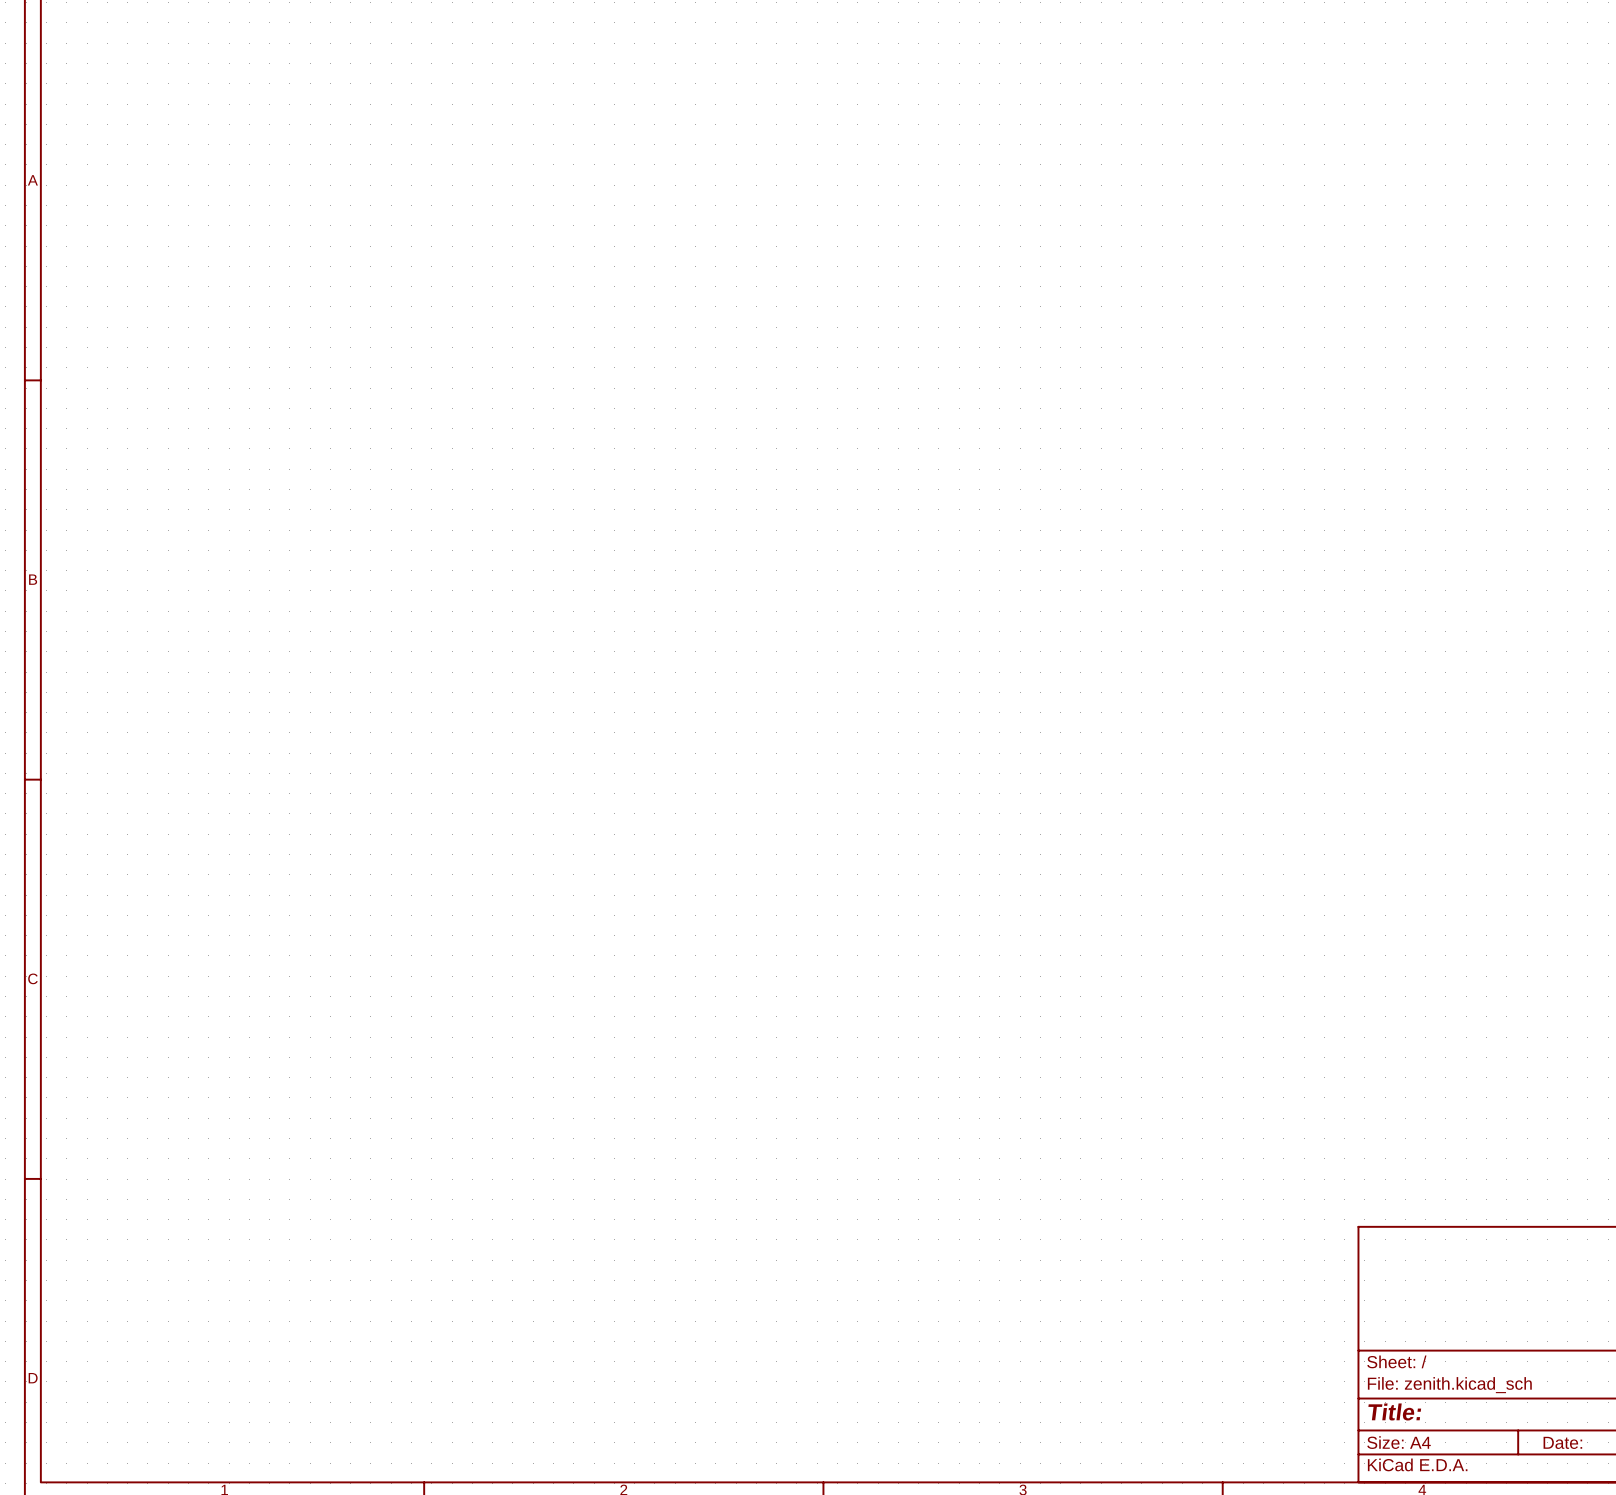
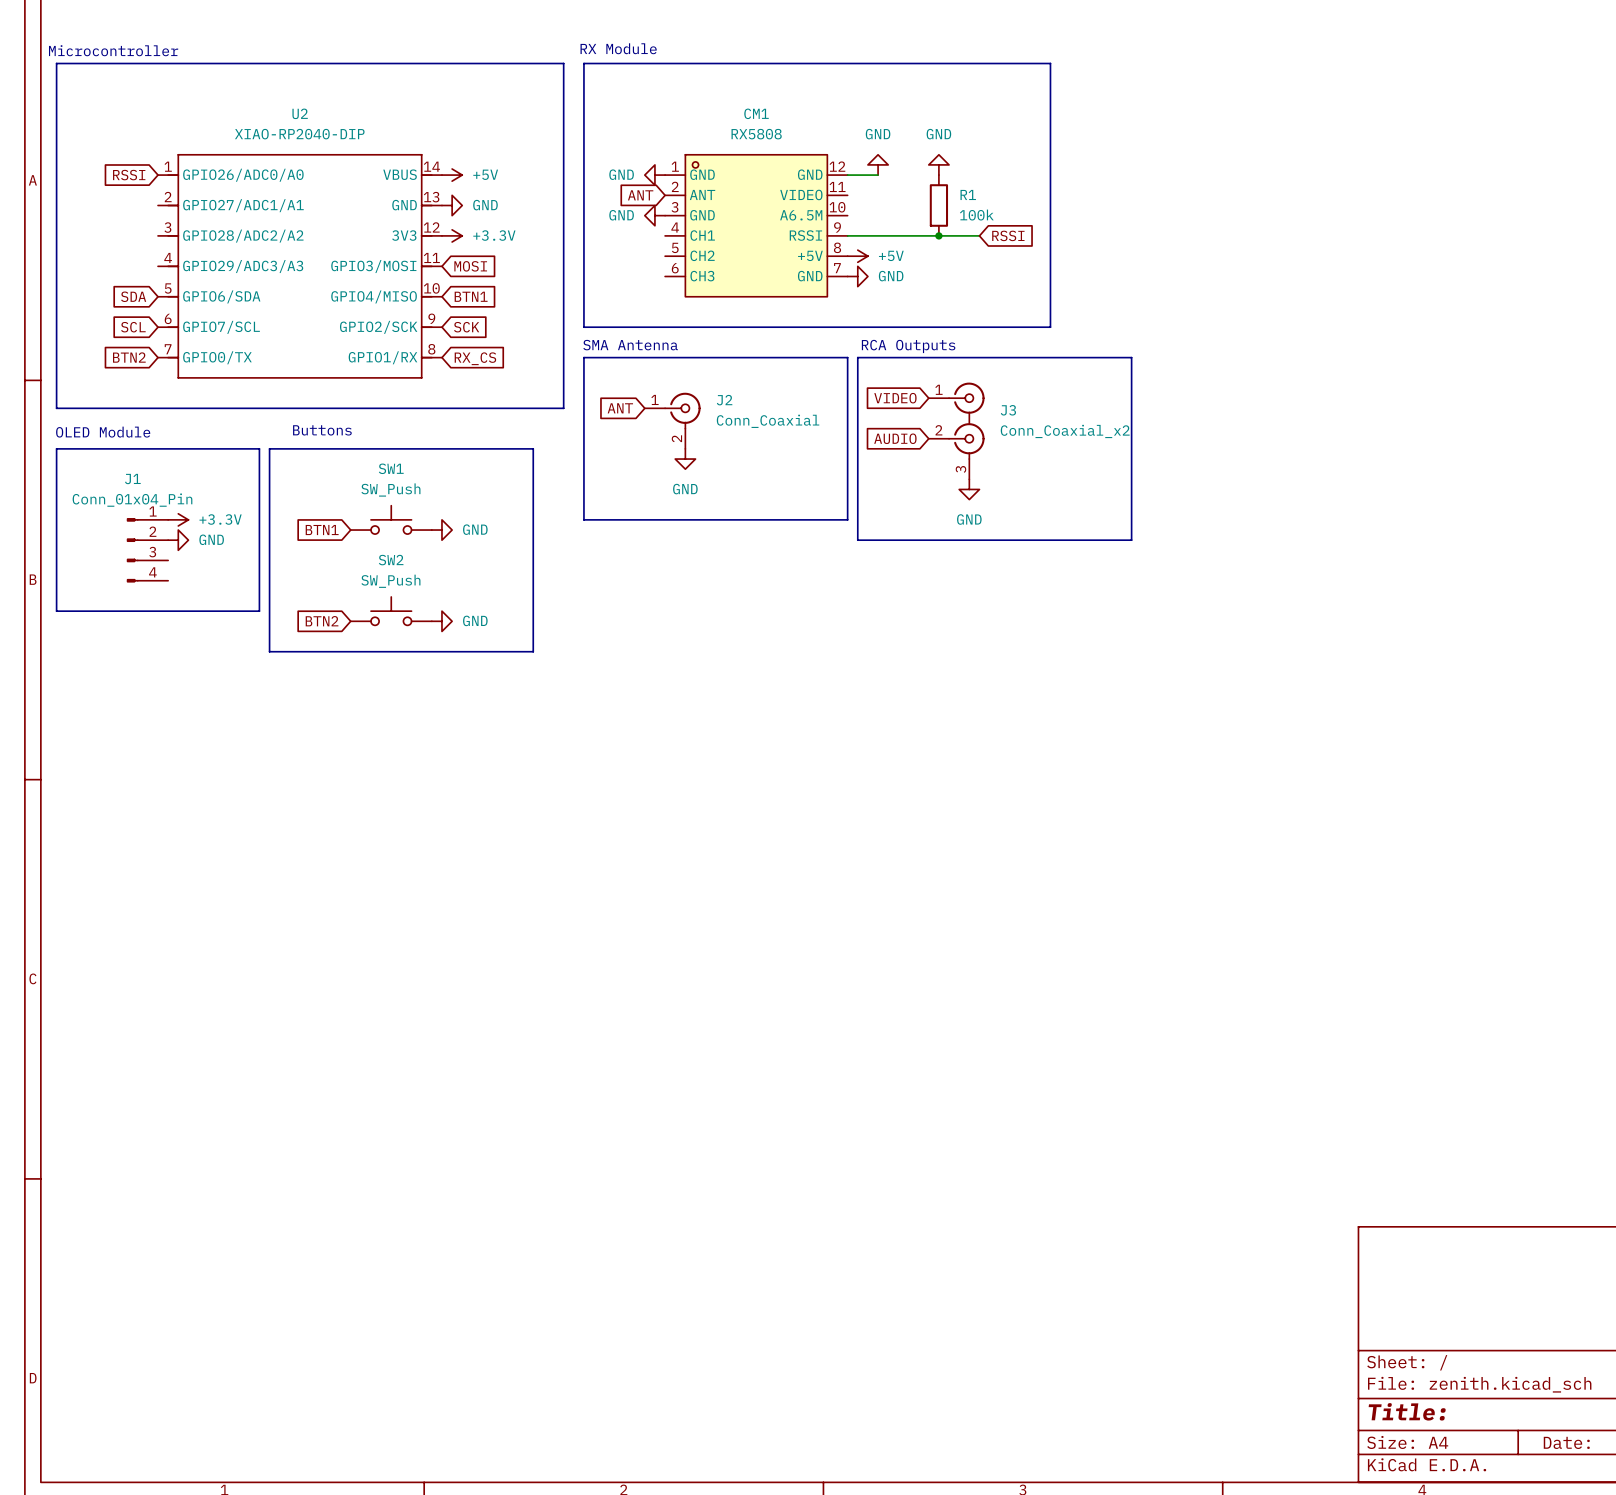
text: none -> RX Module (618, 48)
text: none -> Microcontroller (113, 50)
line: none -> (56, 63) (56, 408) (563, 408) (563, 63) (56, 63)
line: none -> (583, 63) (1050, 63) (1050, 327) (583, 327) (583, 63)
power symbol: none -> GND (878, 164)
power symbol: none -> GND (938, 164)
global label: none -> RSSI (129, 175)
power symbol: none -> +5V (452, 175)
power symbol: none -> GND (654, 175)
wire: none -> (847, 175) (878, 175)
global label: none -> ANT (640, 195)
power symbol: none -> GND (452, 205)
R1: none -> 100k (938, 205)
power symbol: none -> GND (654, 215)
CM1: none -> RX5808 (756, 225)
power symbol: none -> +3.3V (452, 235)
wire: none -> (847, 235) (979, 235)
junction: none -> (938, 235)
global label: none -> RSSI (1008, 235)
power symbol: none -> +5V (857, 256)
U2: none -> XIAO-RP2040-DIP (299, 266)
global label: none -> MOSI (470, 266)
power symbol: none -> GND (857, 276)
global label: none -> SDA (133, 296)
global label: none -> BTN1 (471, 296)
global label: none -> SCL (133, 327)
global label: none -> SCK (466, 327)
text: none -> SMA Antenna (630, 345)
text: none -> RCA Outputs (908, 346)
global label: none -> BTN2 (129, 357)
line: none -> (583, 357) (583, 519) (847, 519) (847, 357) (583, 357)
line: none -> (857, 357) (1131, 357) (1131, 540) (857, 540) (857, 357)
global label: none -> RX_CS (475, 358)
global label: none -> VIDEO (895, 398)
global label: none -> ANT (620, 408)
J2: none -> Conn_Coaxial (672, 420)
text: none -> Buttons (322, 430)
J3: none -> Conn_Coaxial_x2 (956, 430)
text: none -> OLED Module (103, 432)
global label: none -> AUDIO (895, 438)
line: none -> (56, 448) (259, 448) (259, 611) (56, 611) (56, 448)
line: none -> (269, 448) (533, 448) (533, 651) (269, 651) (269, 448)
power symbol: none -> GND (685, 459)
power symbol: none -> GND (969, 489)
power symbol: none -> +3.3V (178, 519)
SW1: none -> SW_Push (391, 519)
global label: none -> BTN1 (322, 530)
power symbol: none -> GND (441, 530)
power symbol: none -> GND (178, 540)
J1: none -> Conn_01x04_Pin (147, 550)
SW2: none -> SW_Push (391, 611)
global label: none -> BTN2 (322, 621)
power symbol: none -> GND (441, 621)

